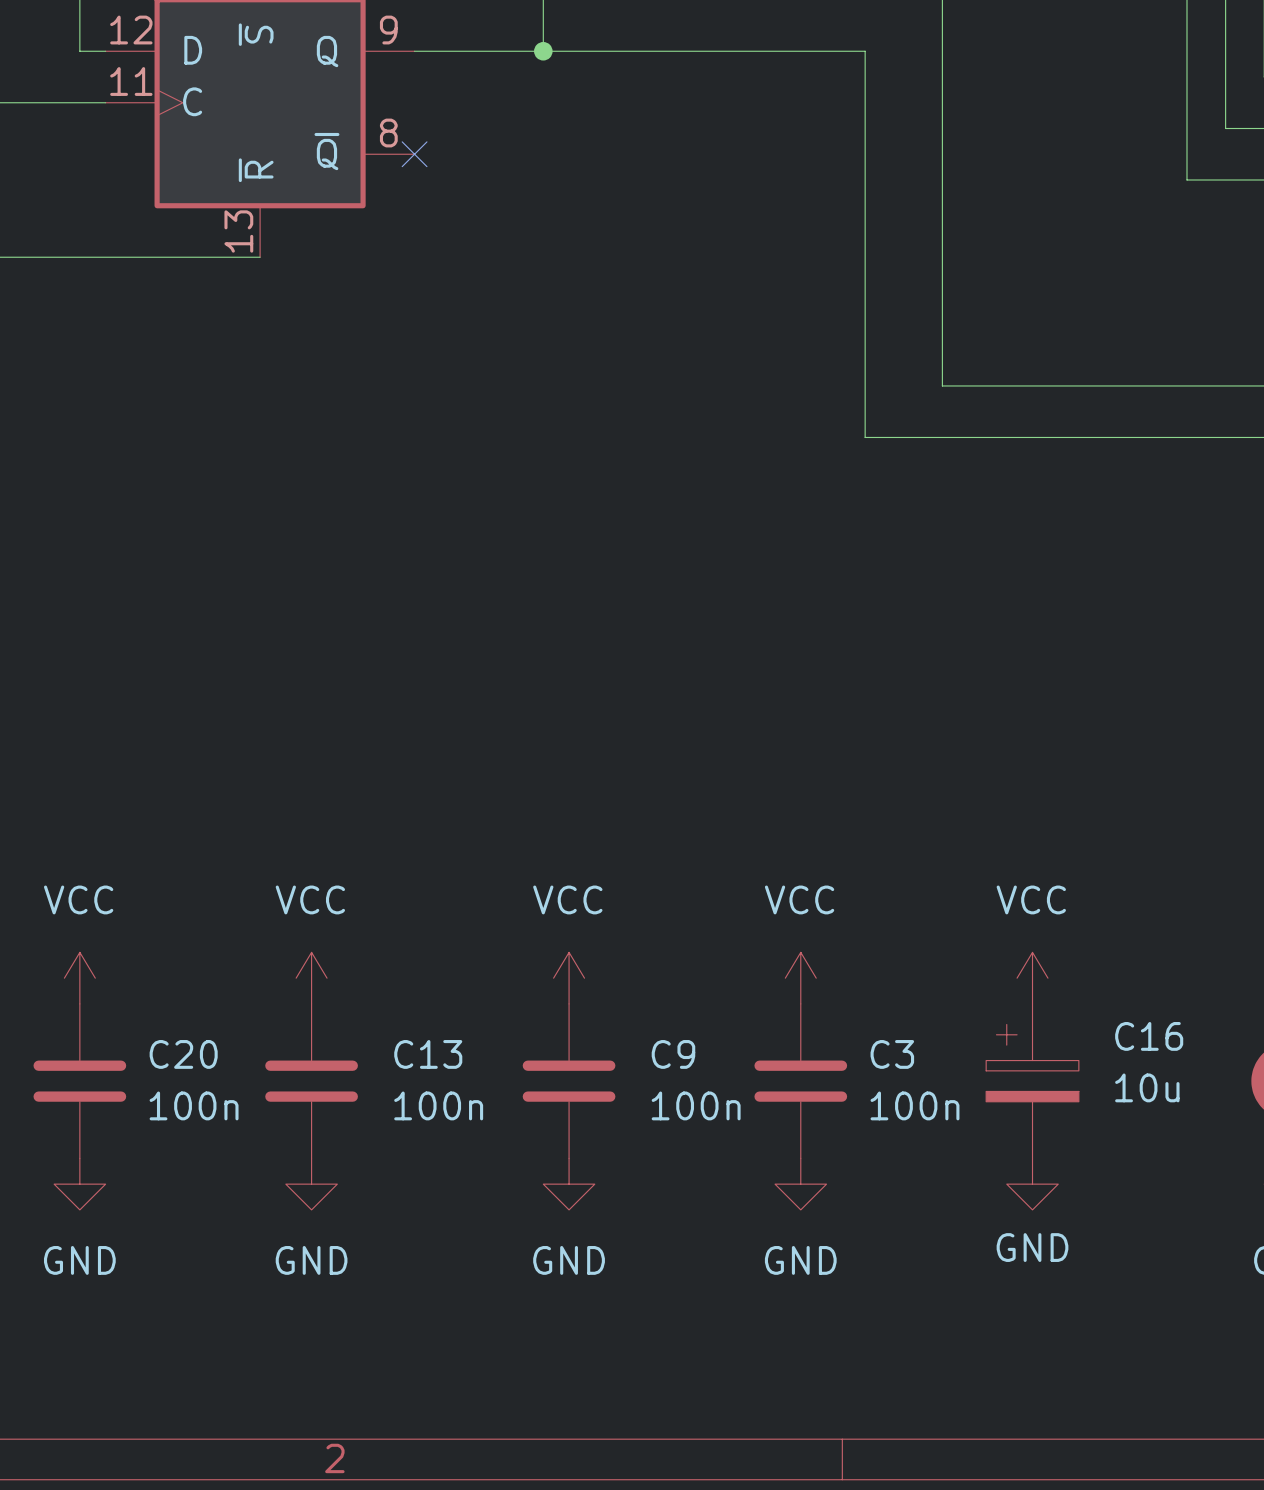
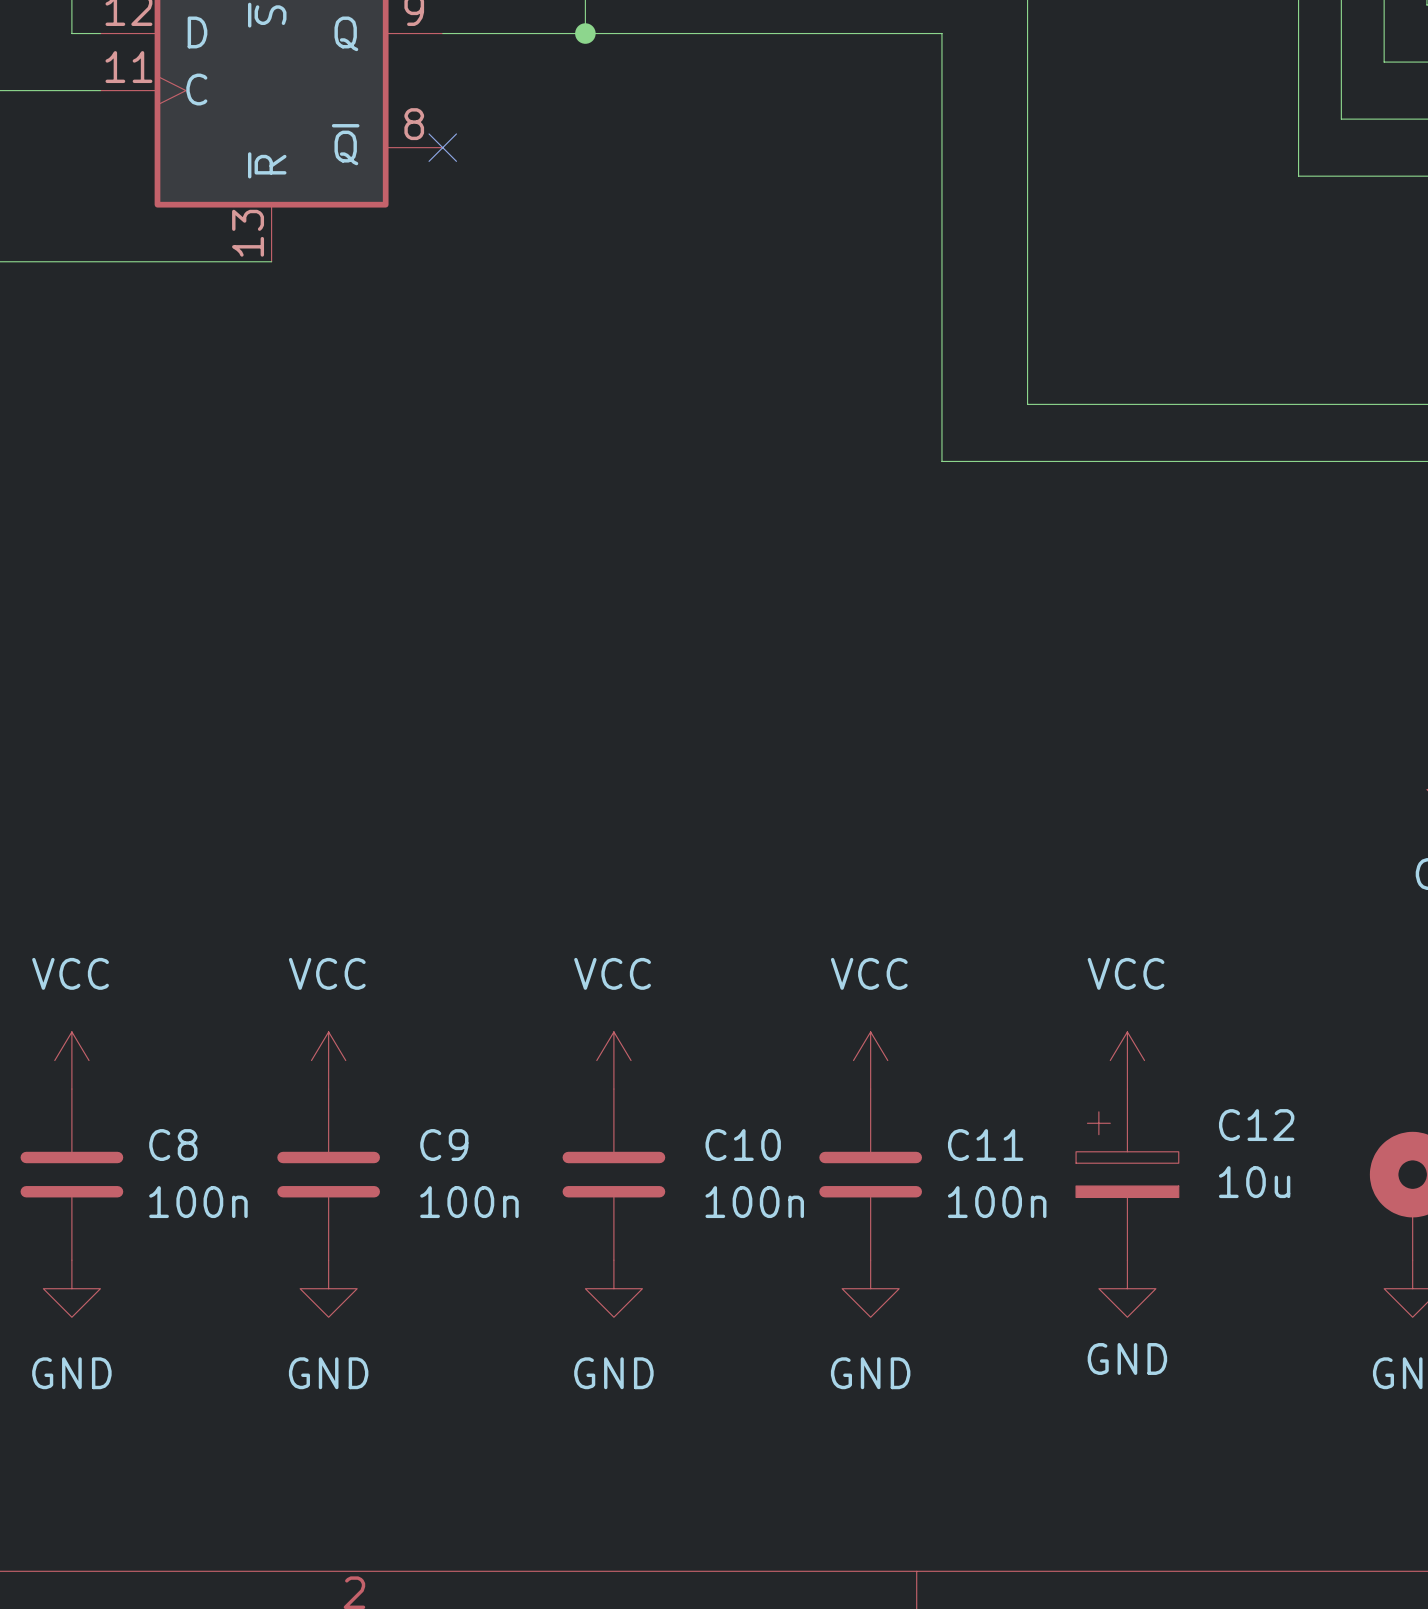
C16 name: C16 (1149, 1036) -> C12 (1256, 1125)
C20 name: C20 (183, 1054) -> C8 (173, 1145)
C13 name: C13 (428, 1054) -> C9 (444, 1145)
C9 name: C9 (673, 1054) -> C10 (743, 1145)
C3 name: C3 (892, 1054) -> C11 (985, 1145)

